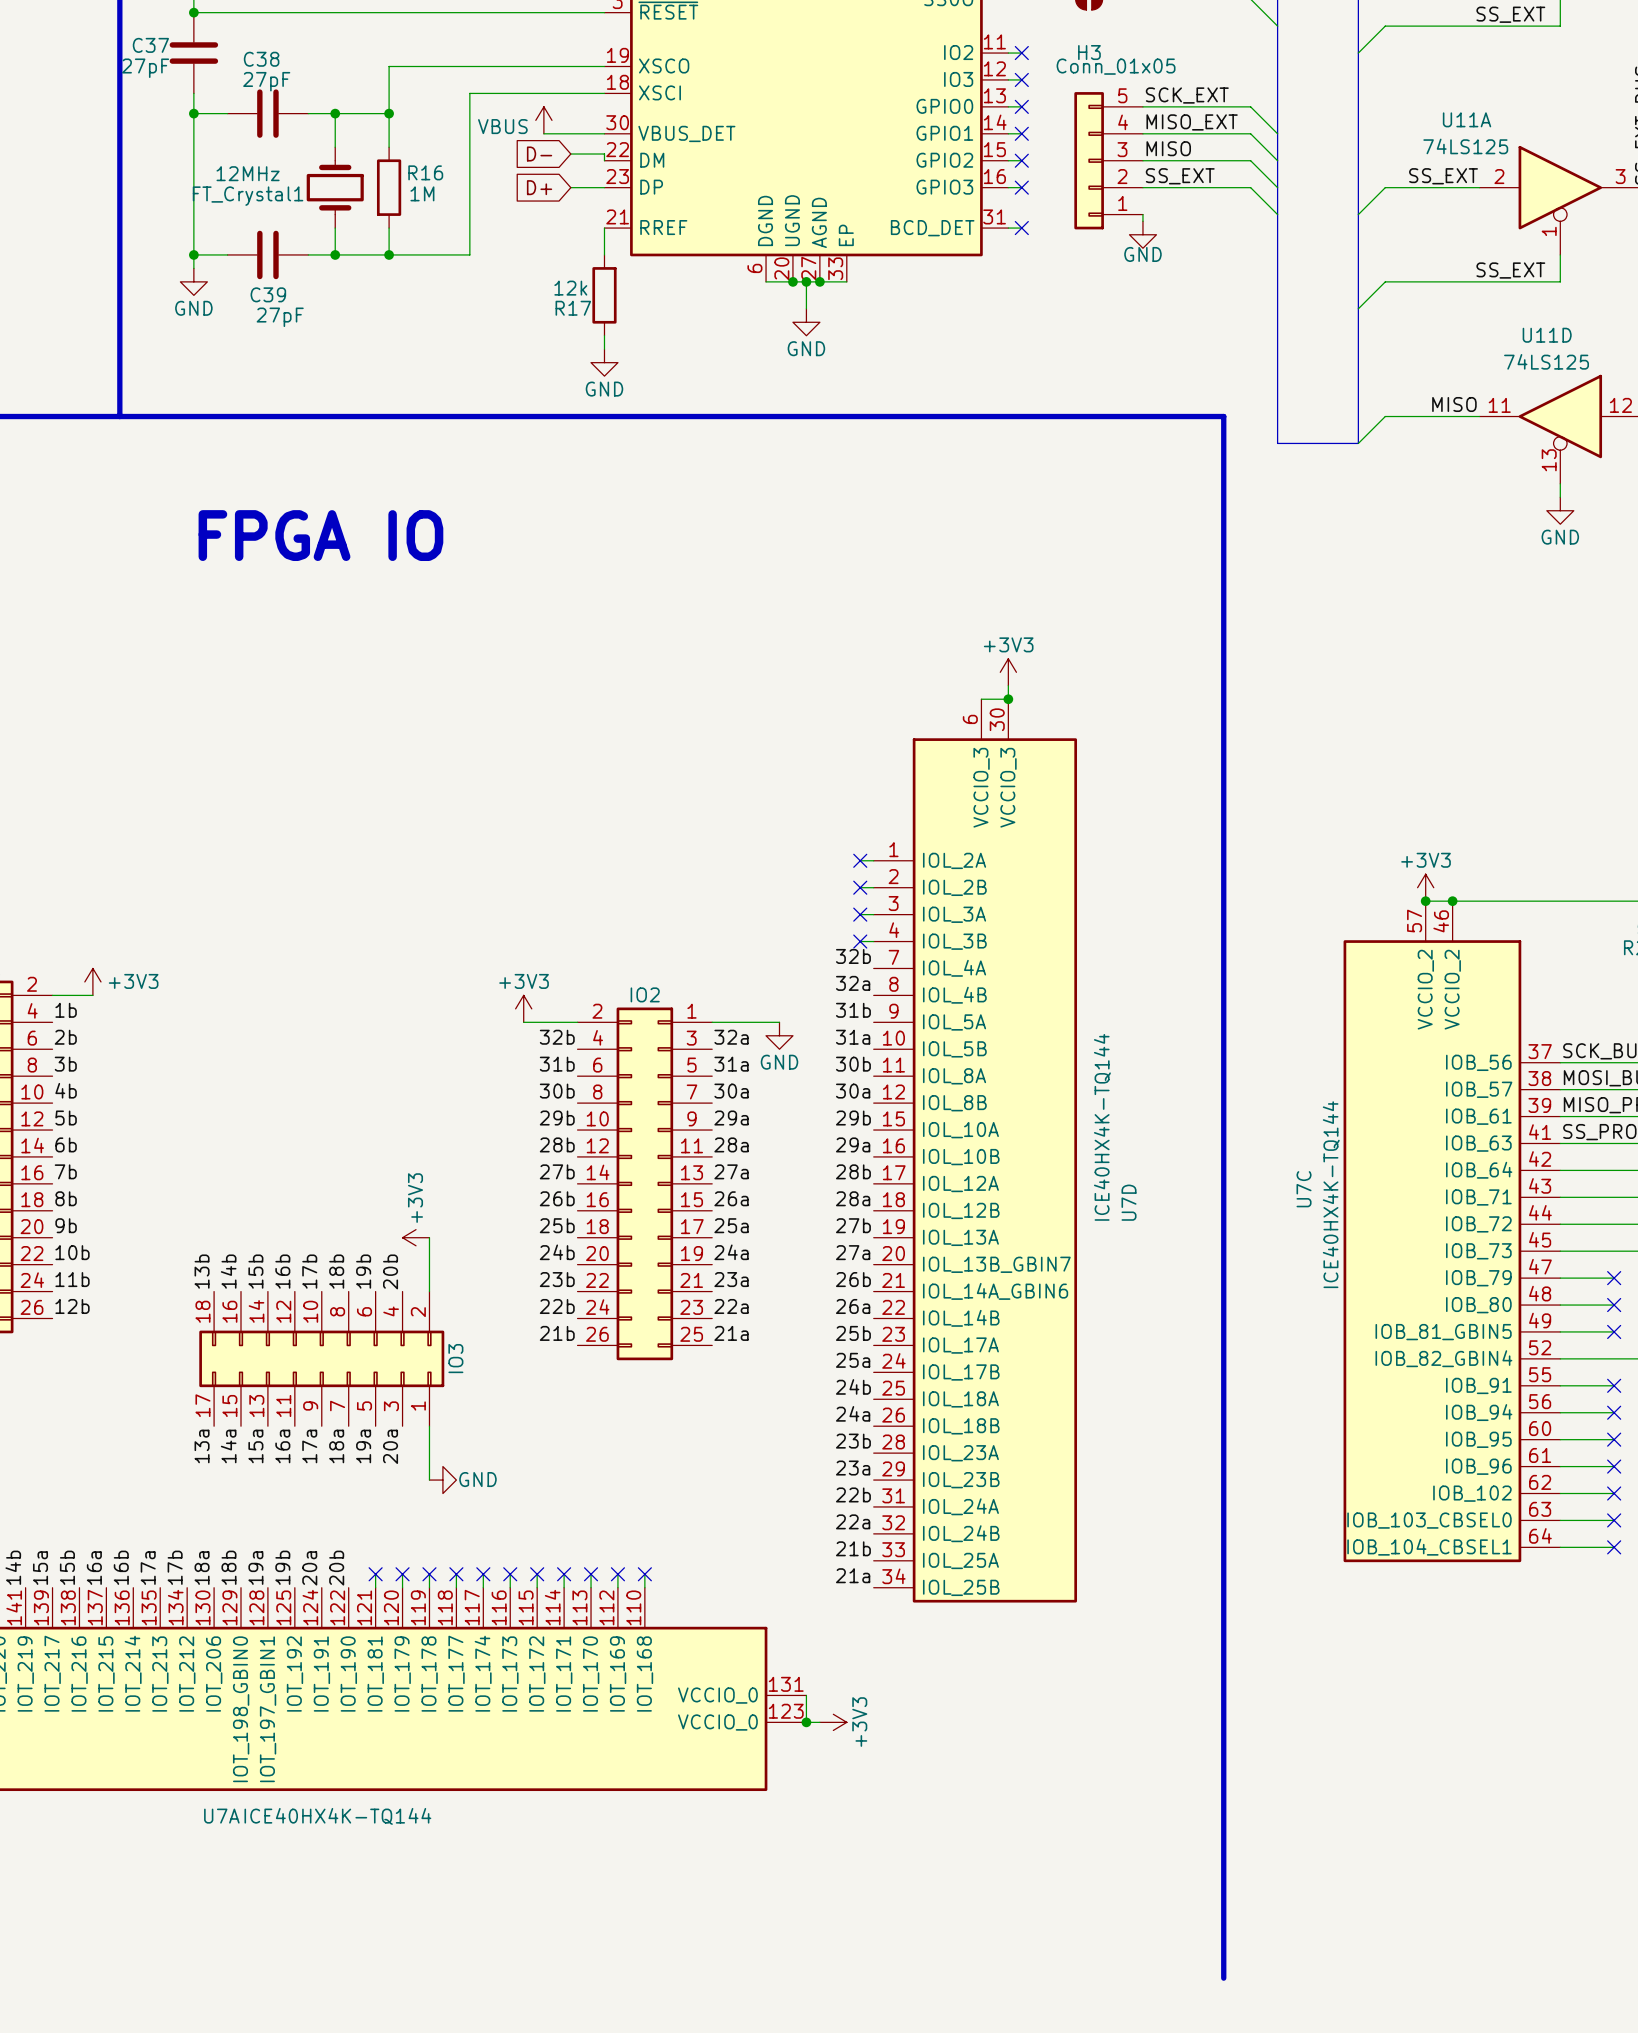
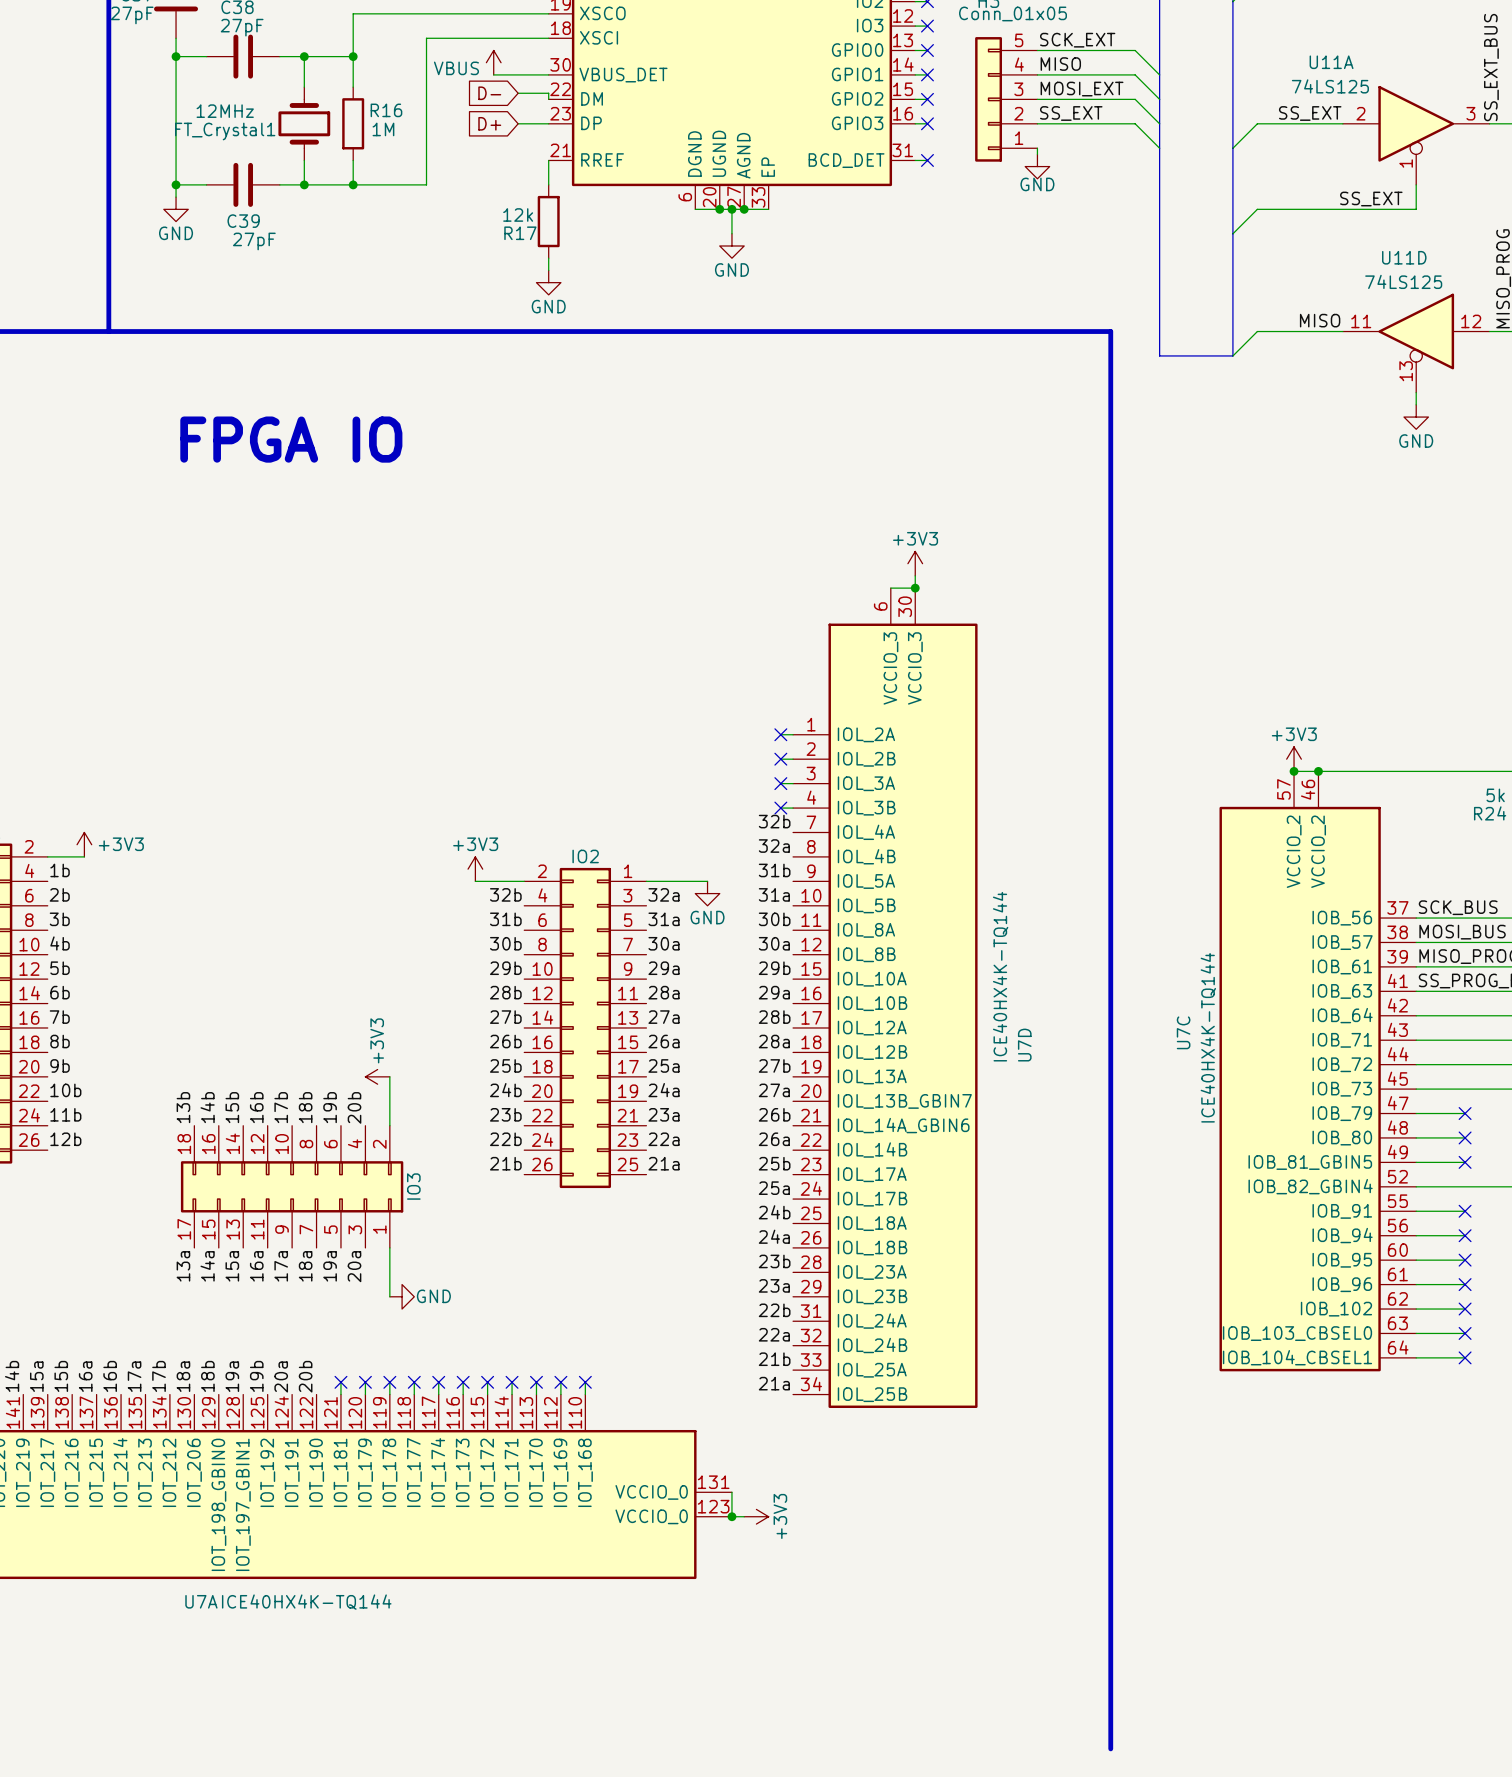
label: MISO_EXT (1192, 122) -> MISO (1060, 64)
label: MISO (1168, 148) -> MOSI_EXT (1082, 89)

